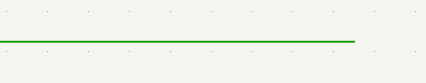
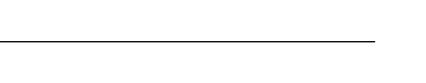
wire: none -> (354, 41) (374, 41)

